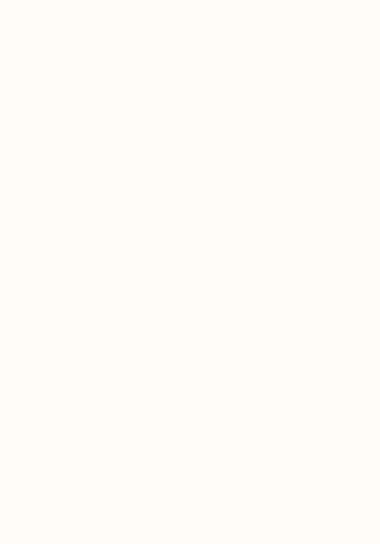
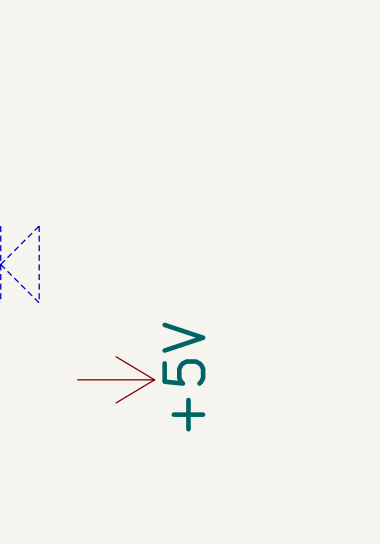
line: none -> (0, 226) (0, 302)
line: none -> (39, 226) (39, 302) (0, 264) (39, 226)
power symbol: none -> +5V (116, 379)

